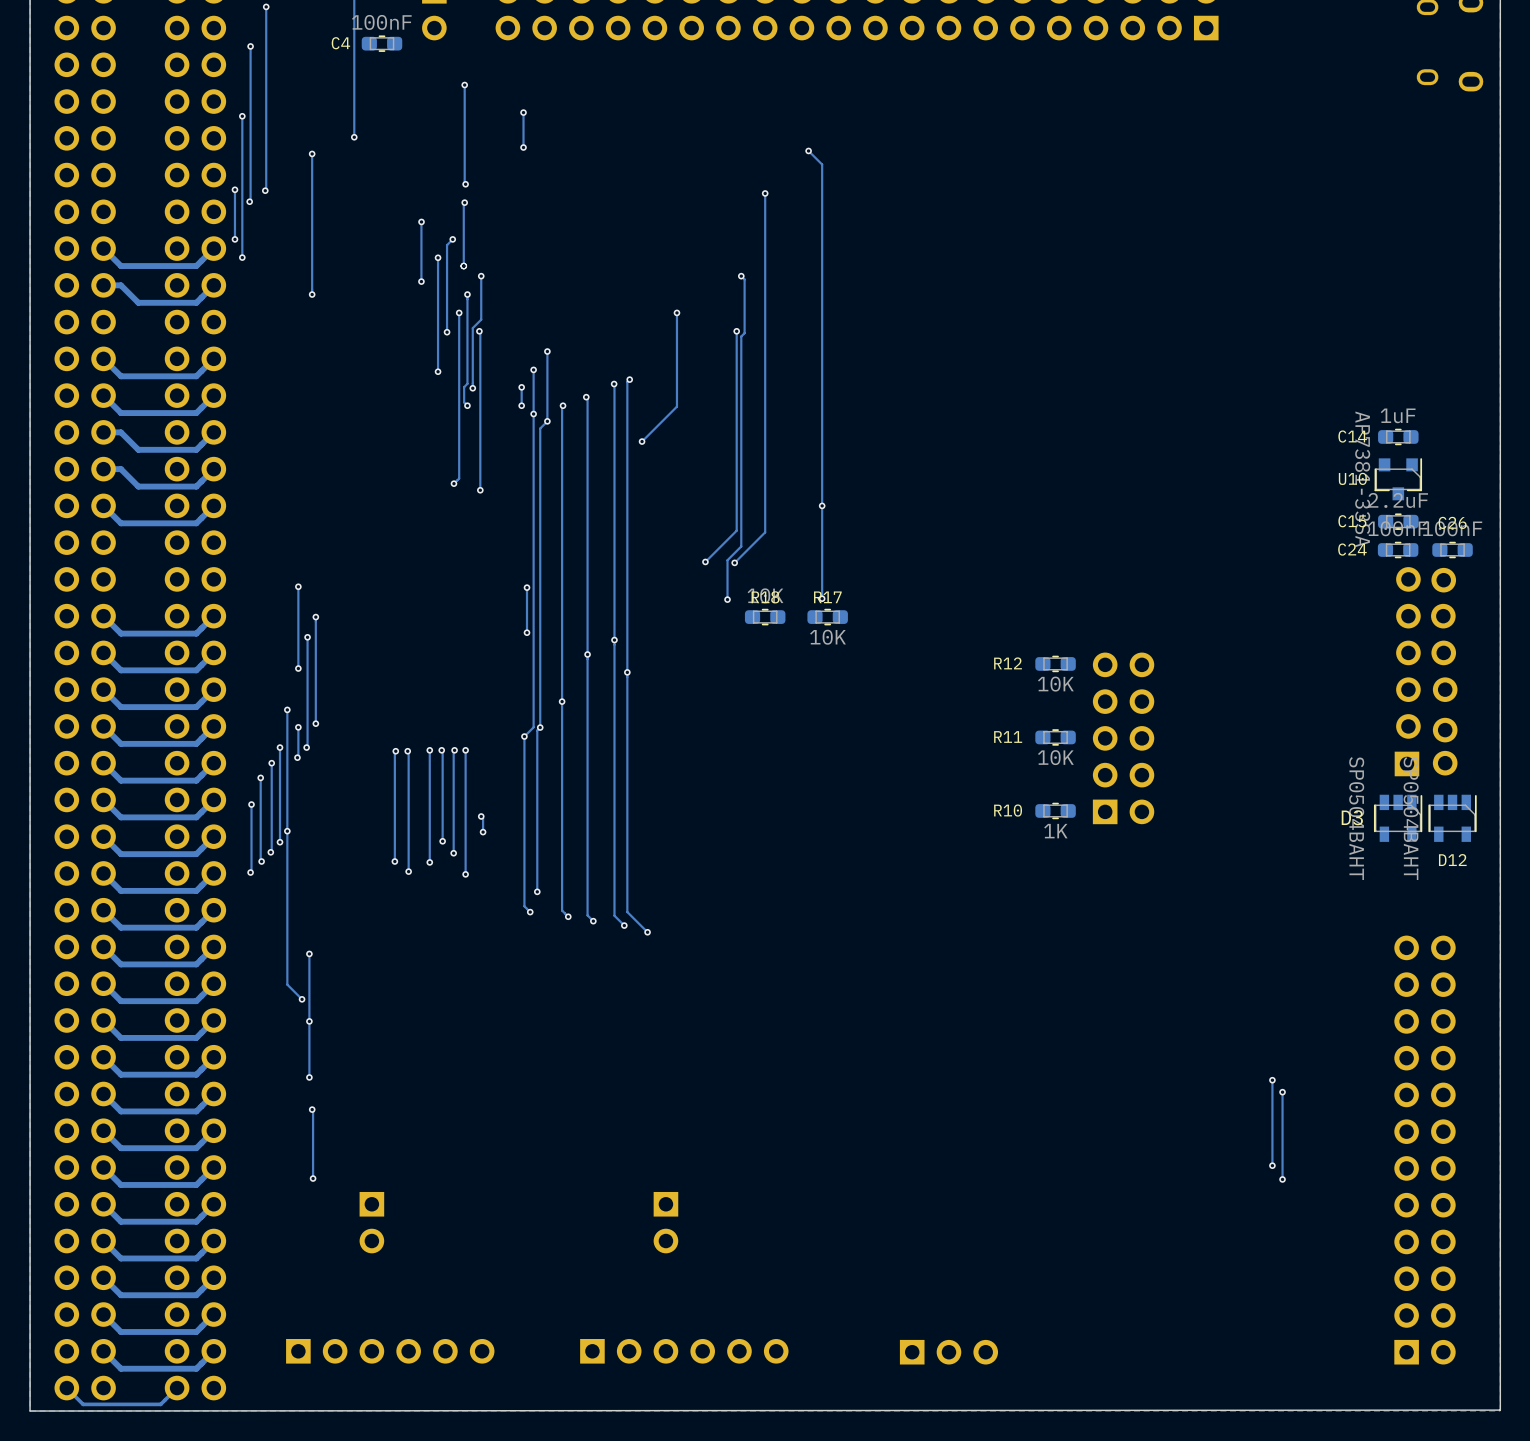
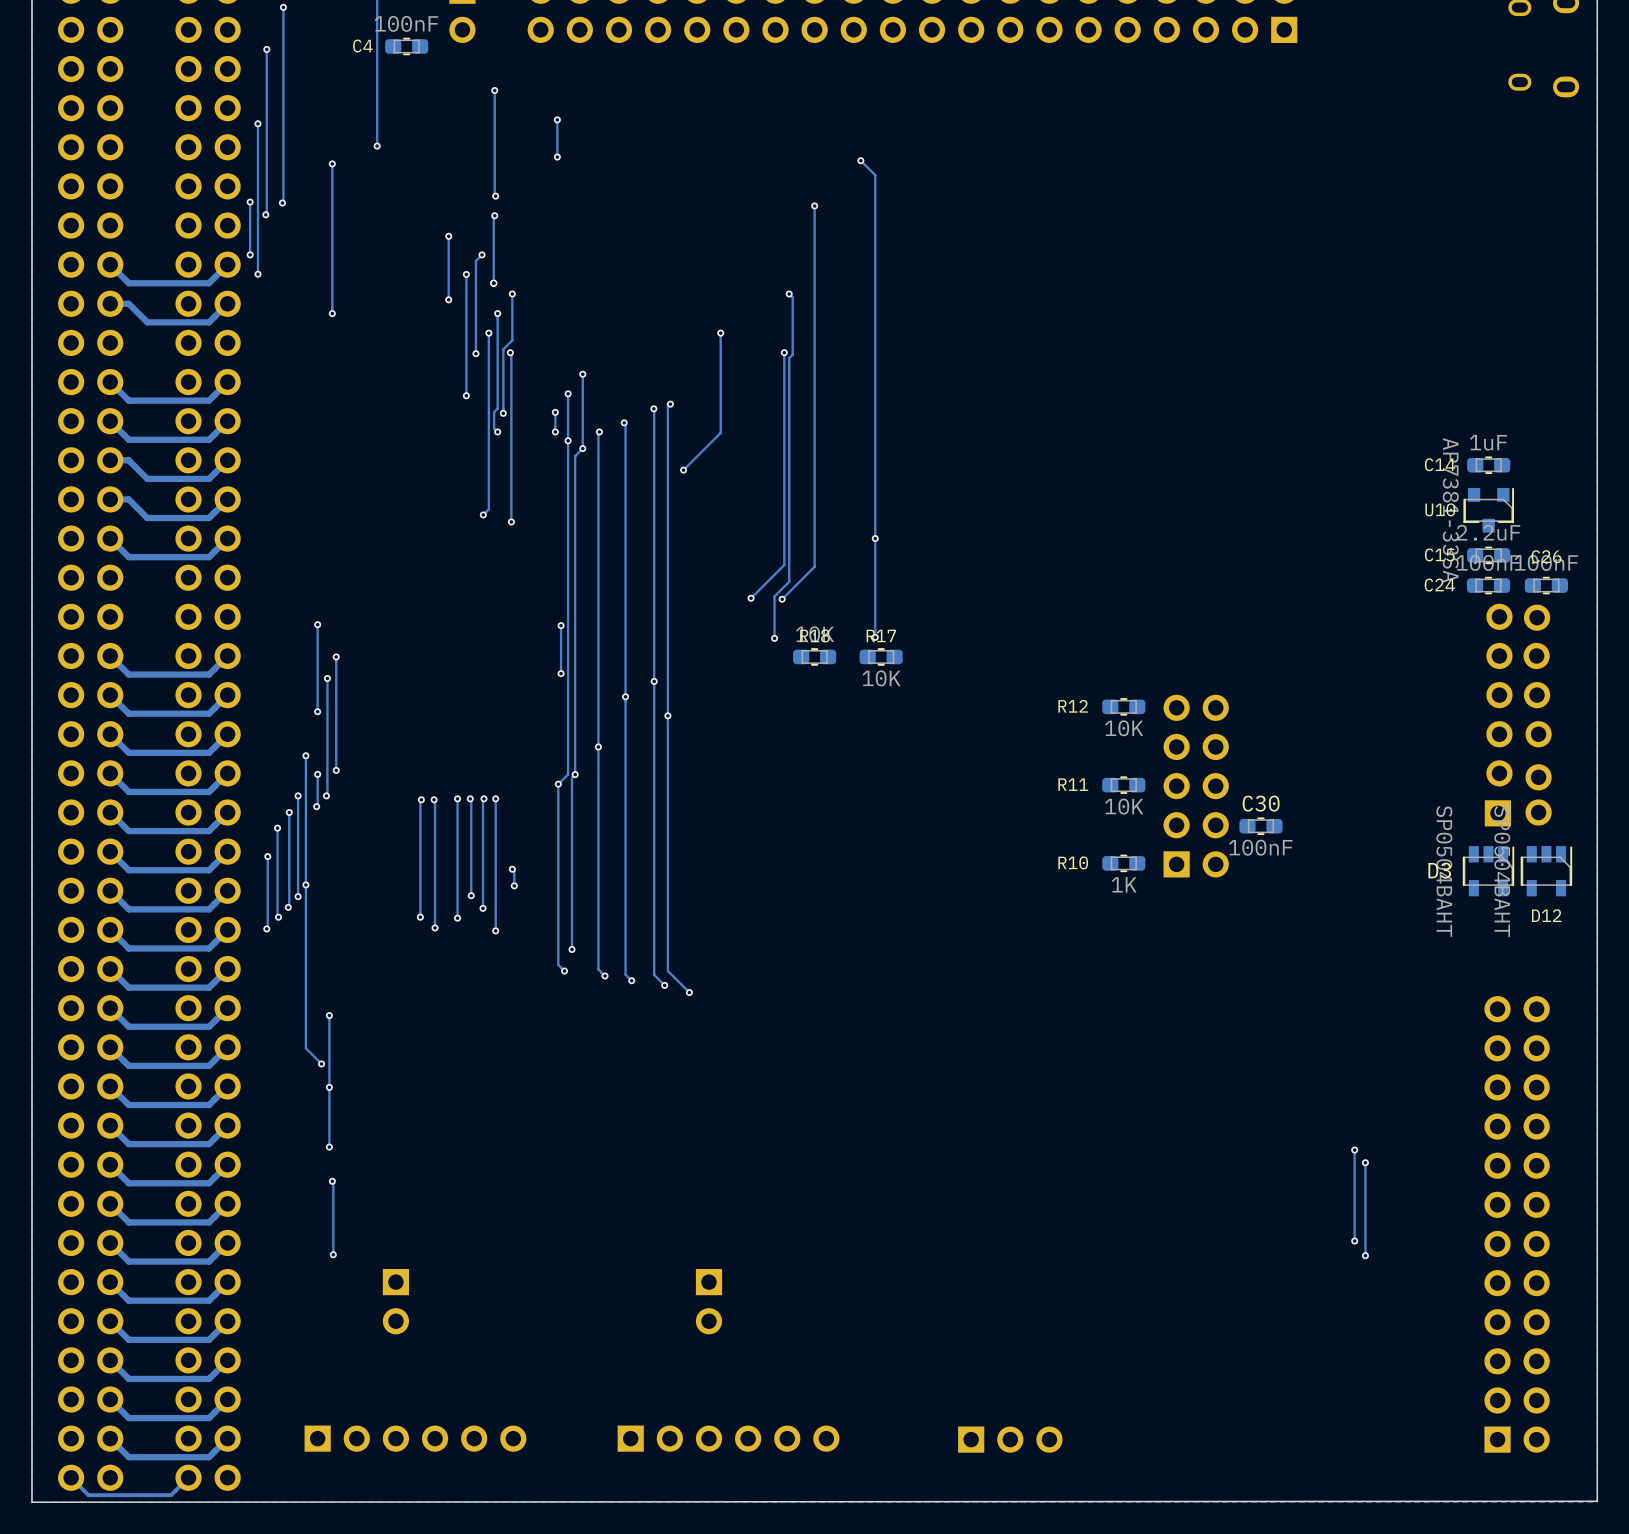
C30: none -> 100nF (1260, 826)

